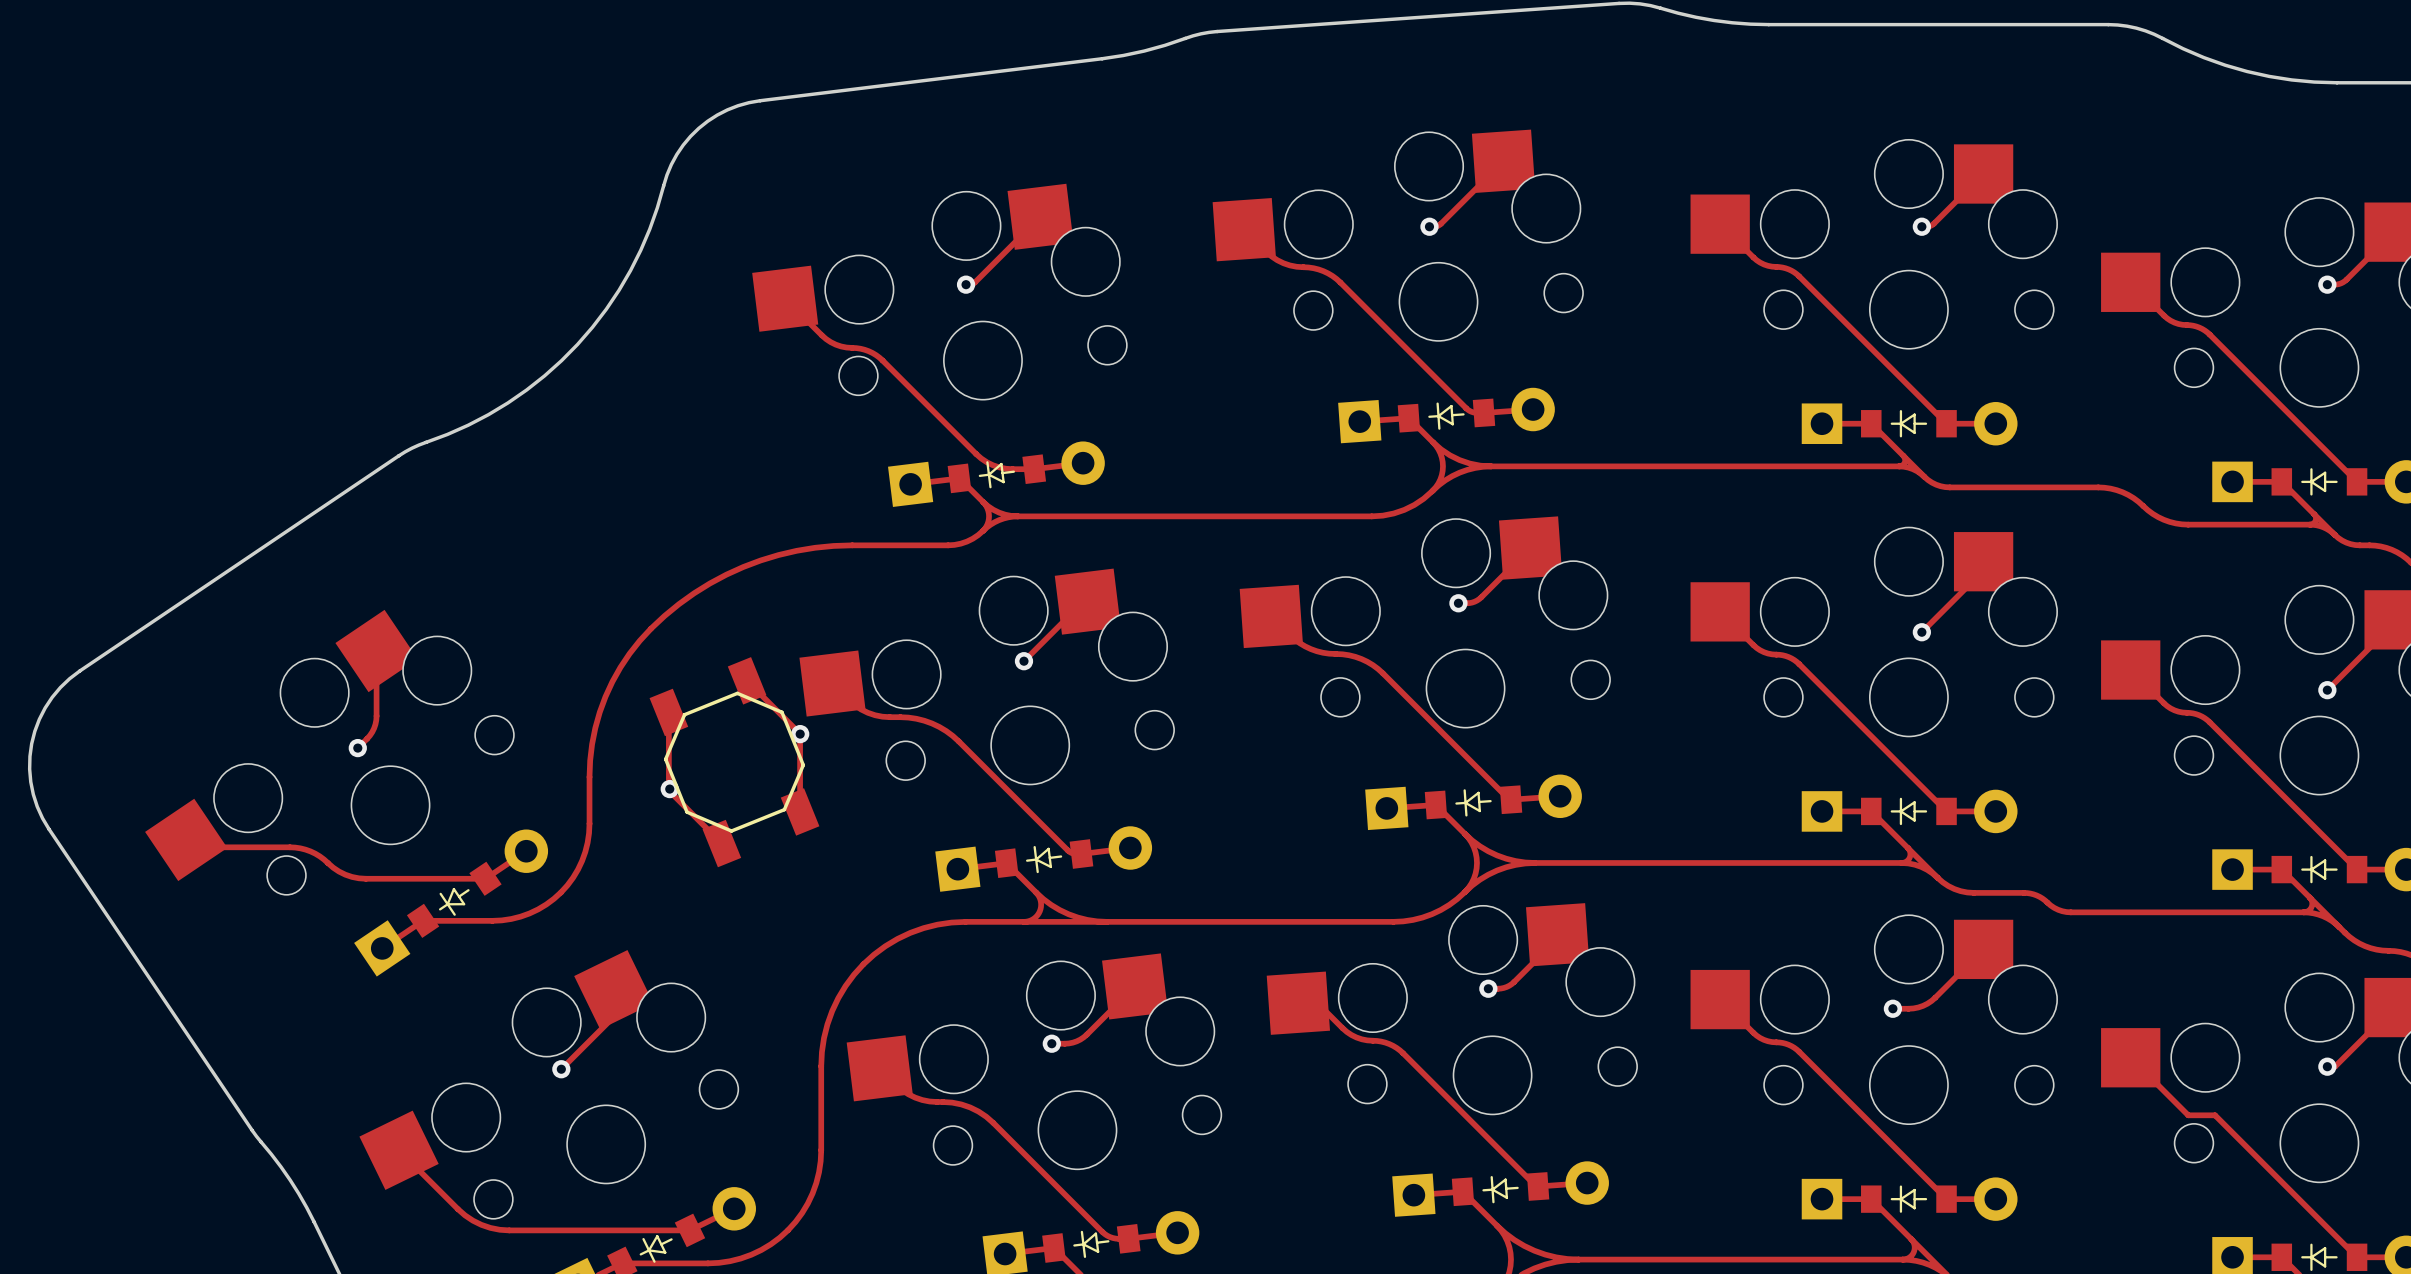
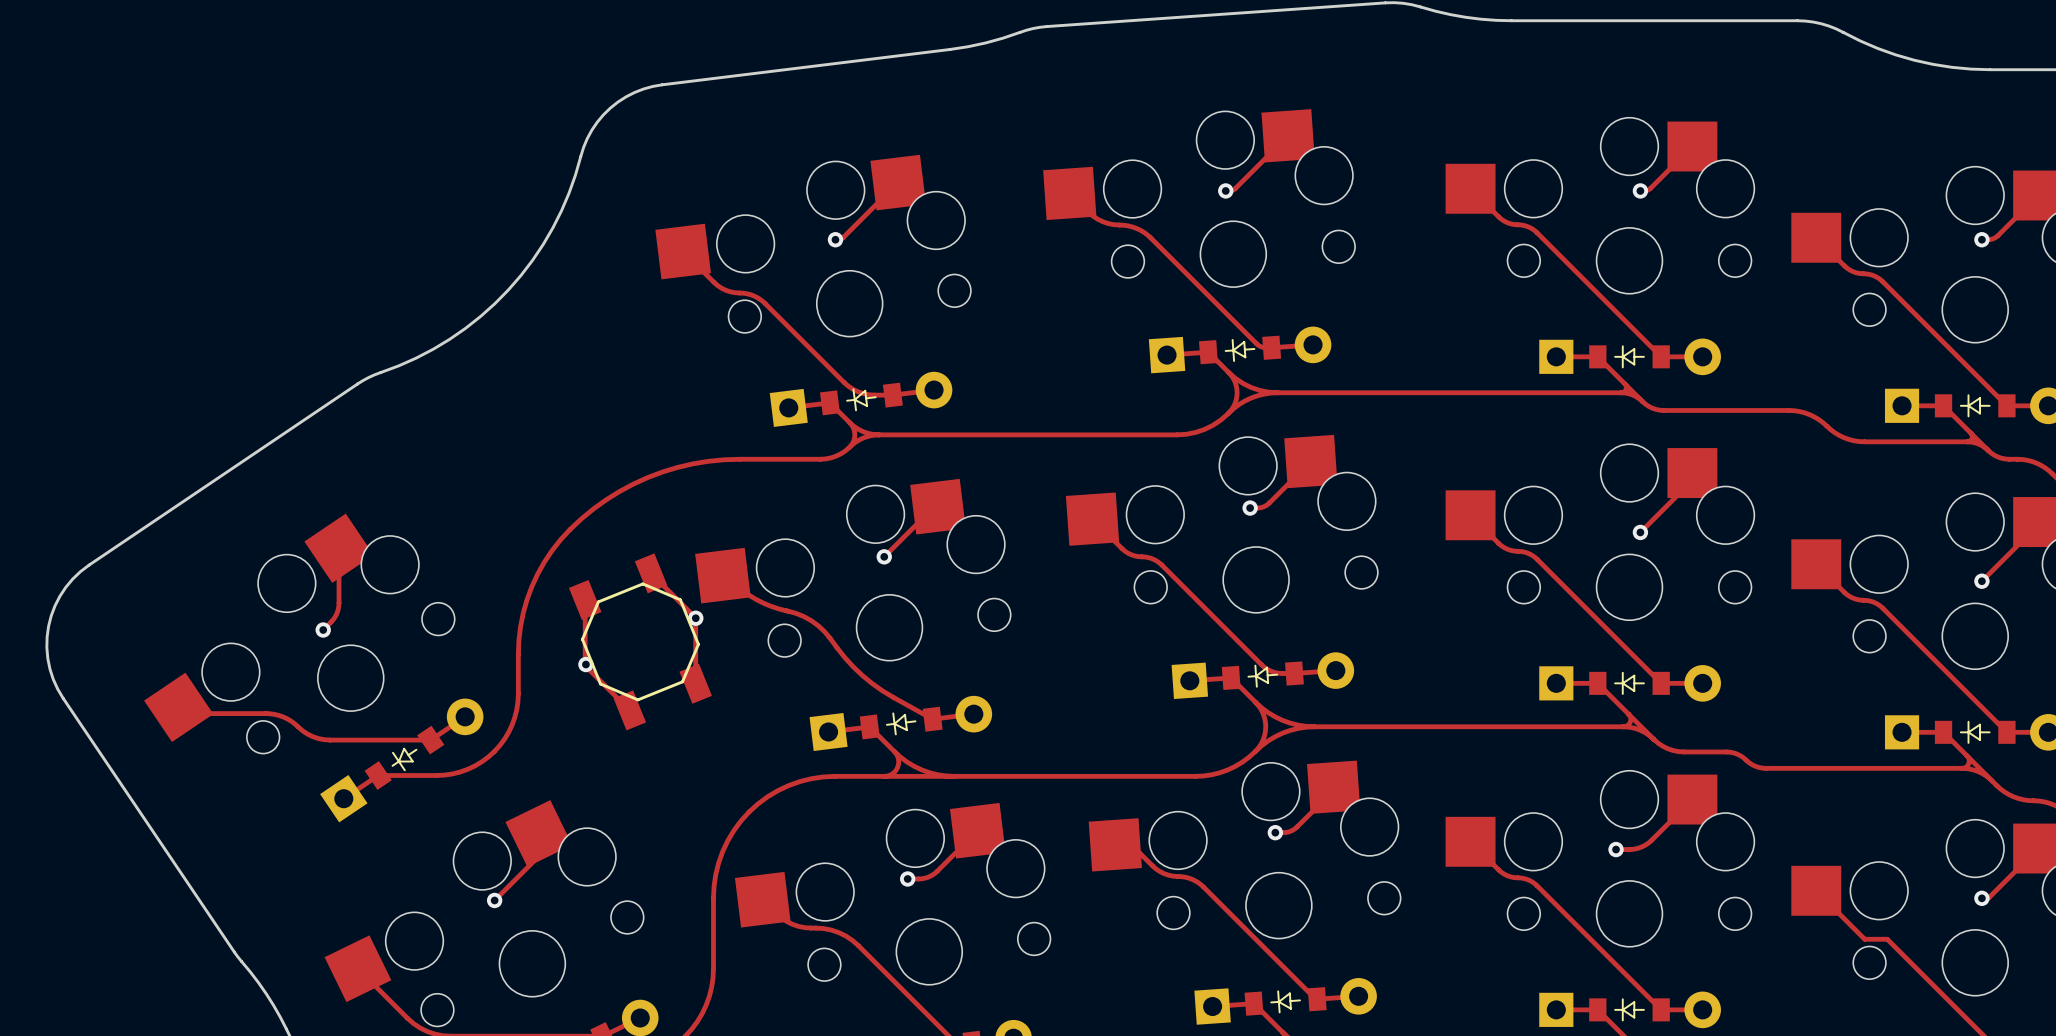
track: none -> (1092, 519) (1127, 553) (1150, 558) (1159, 563) (1264, 667) (1274, 672) (1294, 673)
track: (1290, 635) (1310, 649) (1322, 652) (1355, 656) (1378, 668) (1508, 799) -> none
track: (849, 700) (861, 709) (875, 715) (916, 718) (931, 723) (946, 731) (1067, 850) (1076, 854) -> none
track: none -> (742, 590) (763, 603) (796, 613) (811, 620) (824, 631) (853, 667) (872, 683) (932, 719)

